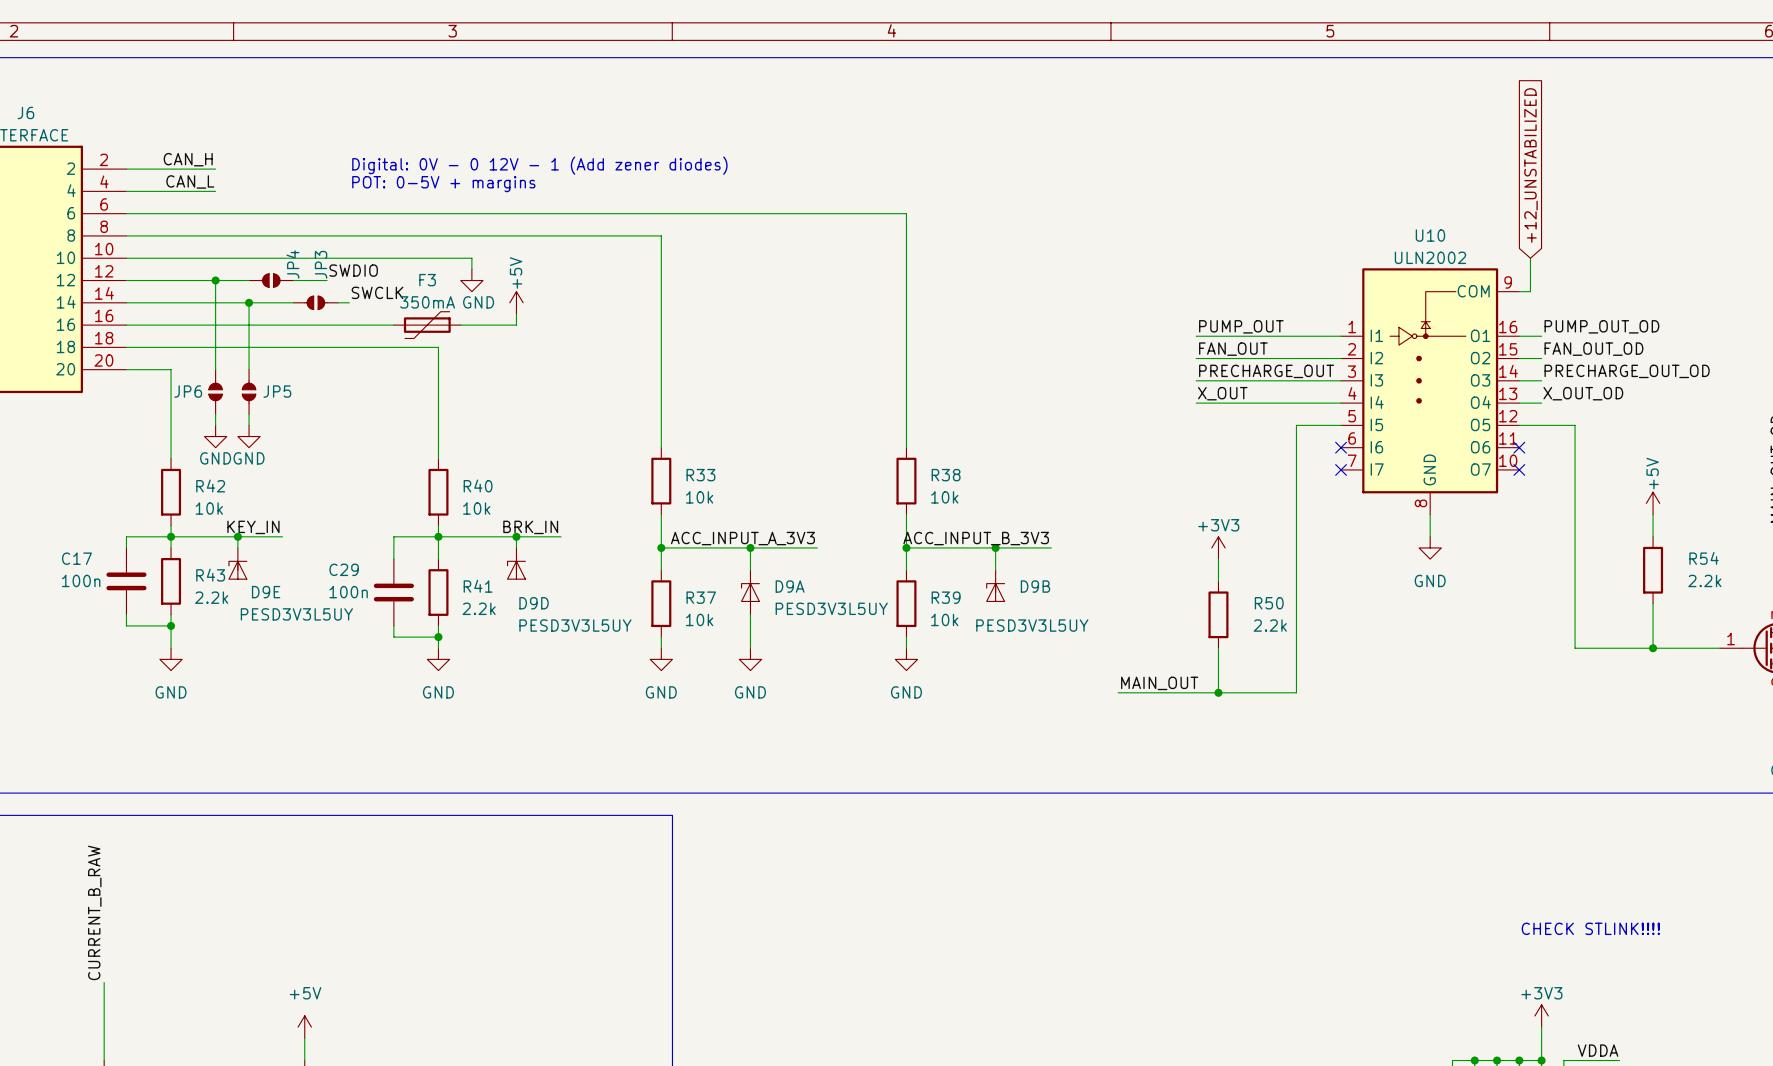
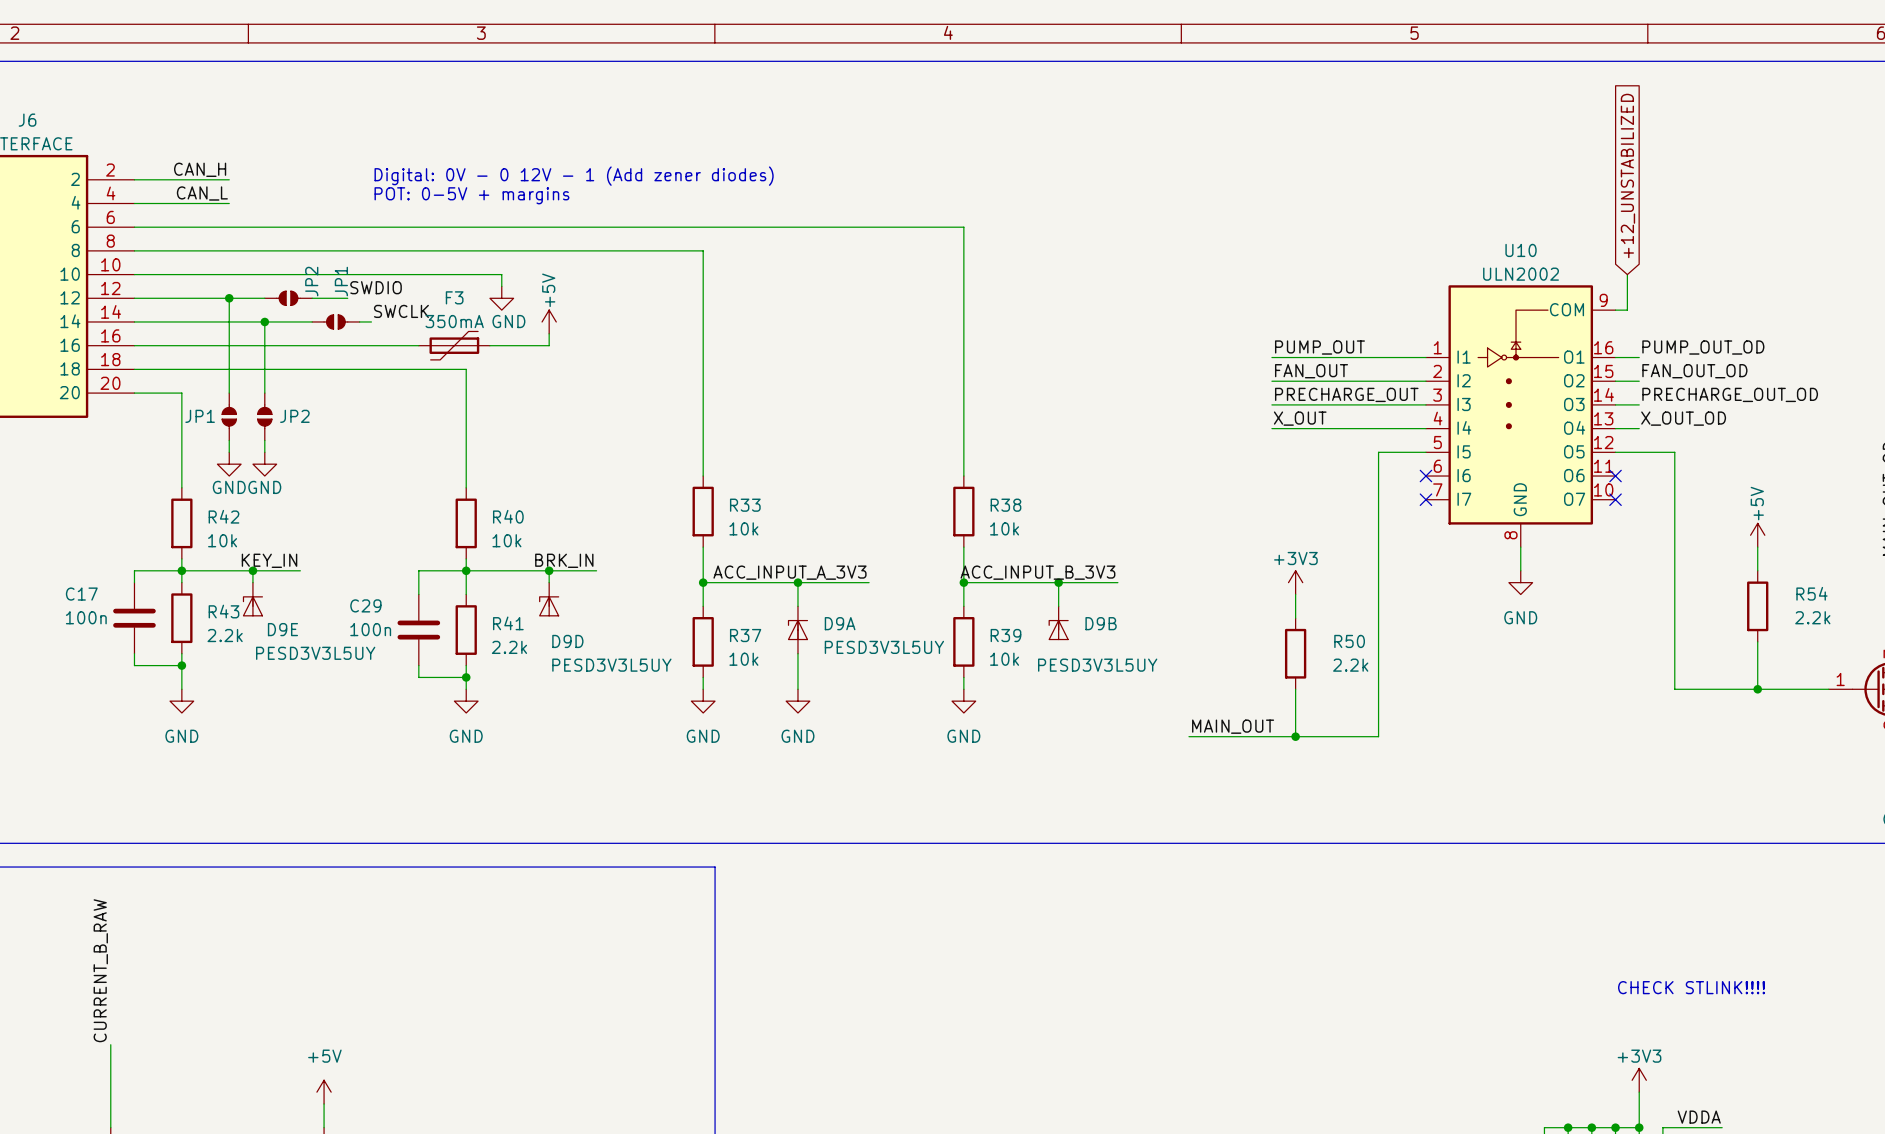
JP4 name: JP4 (292, 264) -> JP2 (311, 281)
JP3 name: JP3 (321, 264) -> JP1 (341, 281)
JP6 name: JP6 (188, 391) -> JP1 (200, 416)
JP5 name: JP5 (277, 391) -> JP2 (294, 416)

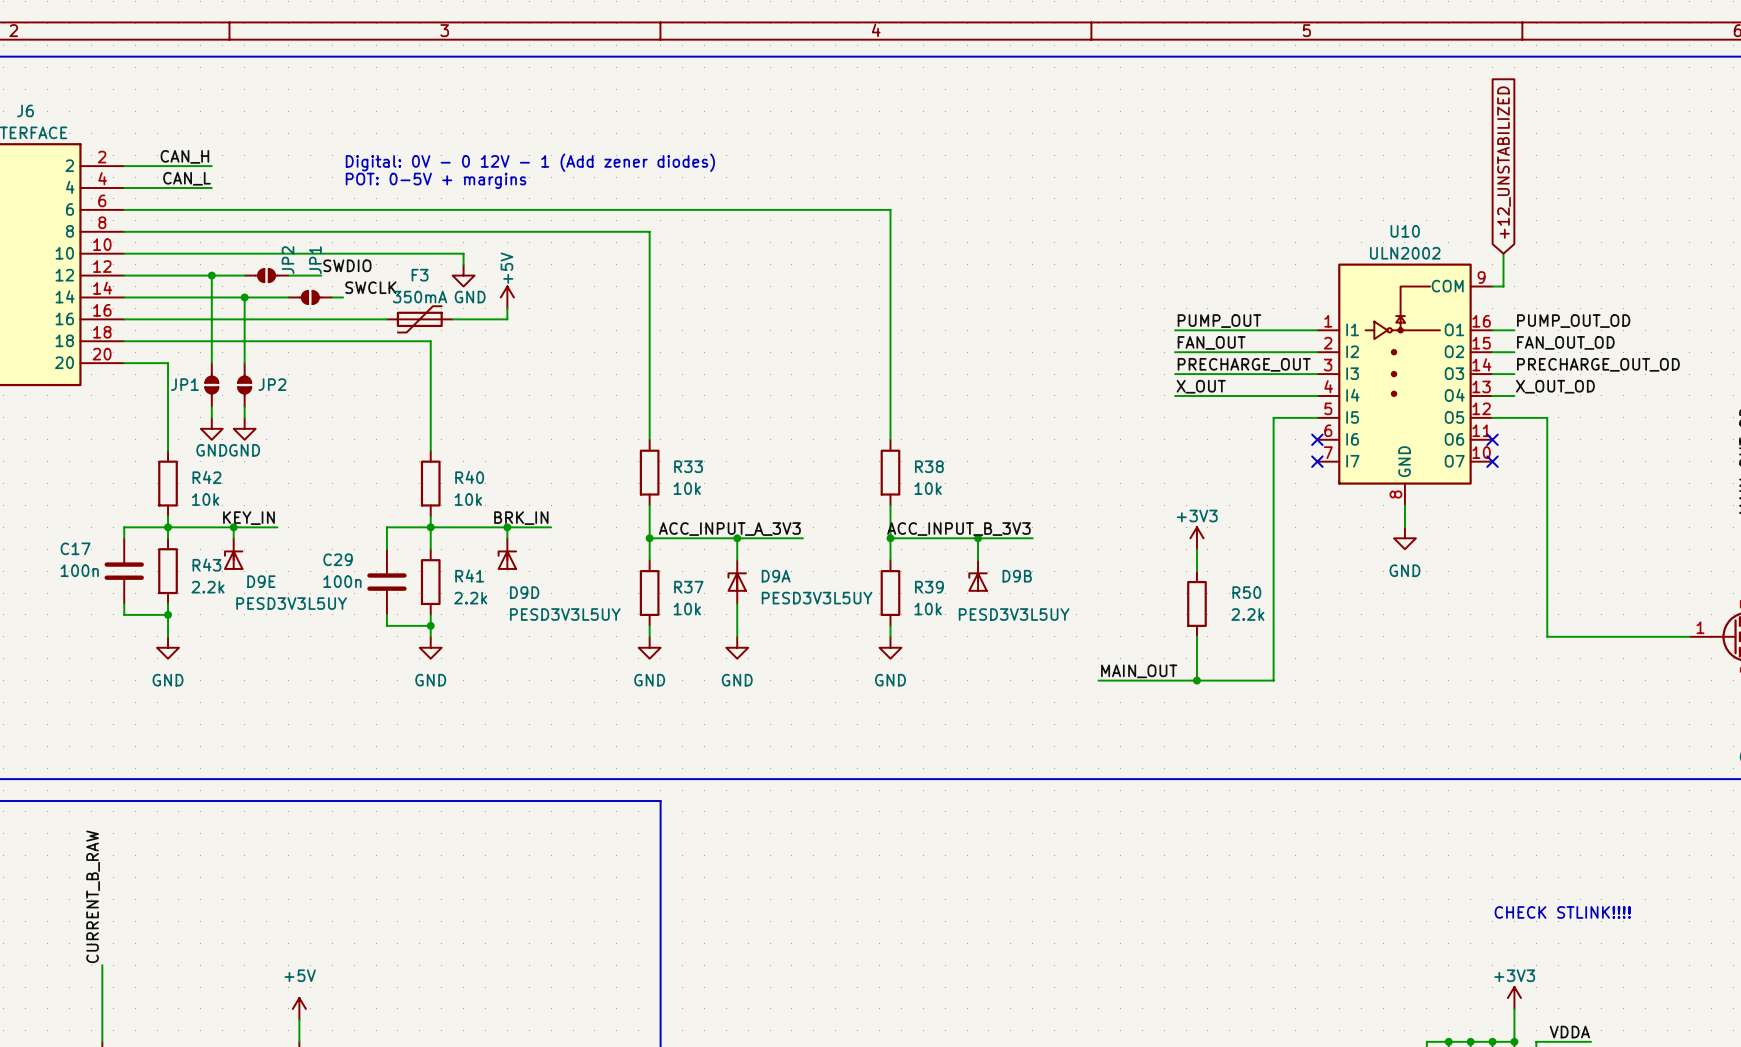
power symbol: +5V (1757, 535) -> none
wire: (1757, 547) (1757, 570) -> none
R54: 2.2k (1757, 606) -> none
wire: (1757, 641) (1757, 689) -> none
junction: (1757, 689) -> none

